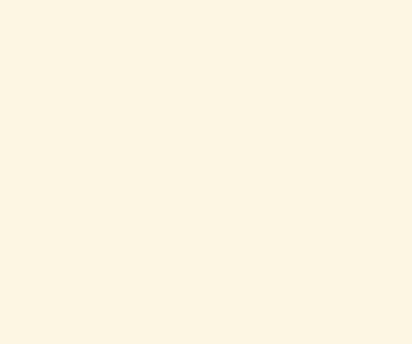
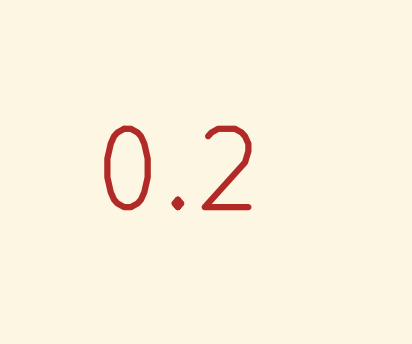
text: none -> 0.2 (177, 167)

